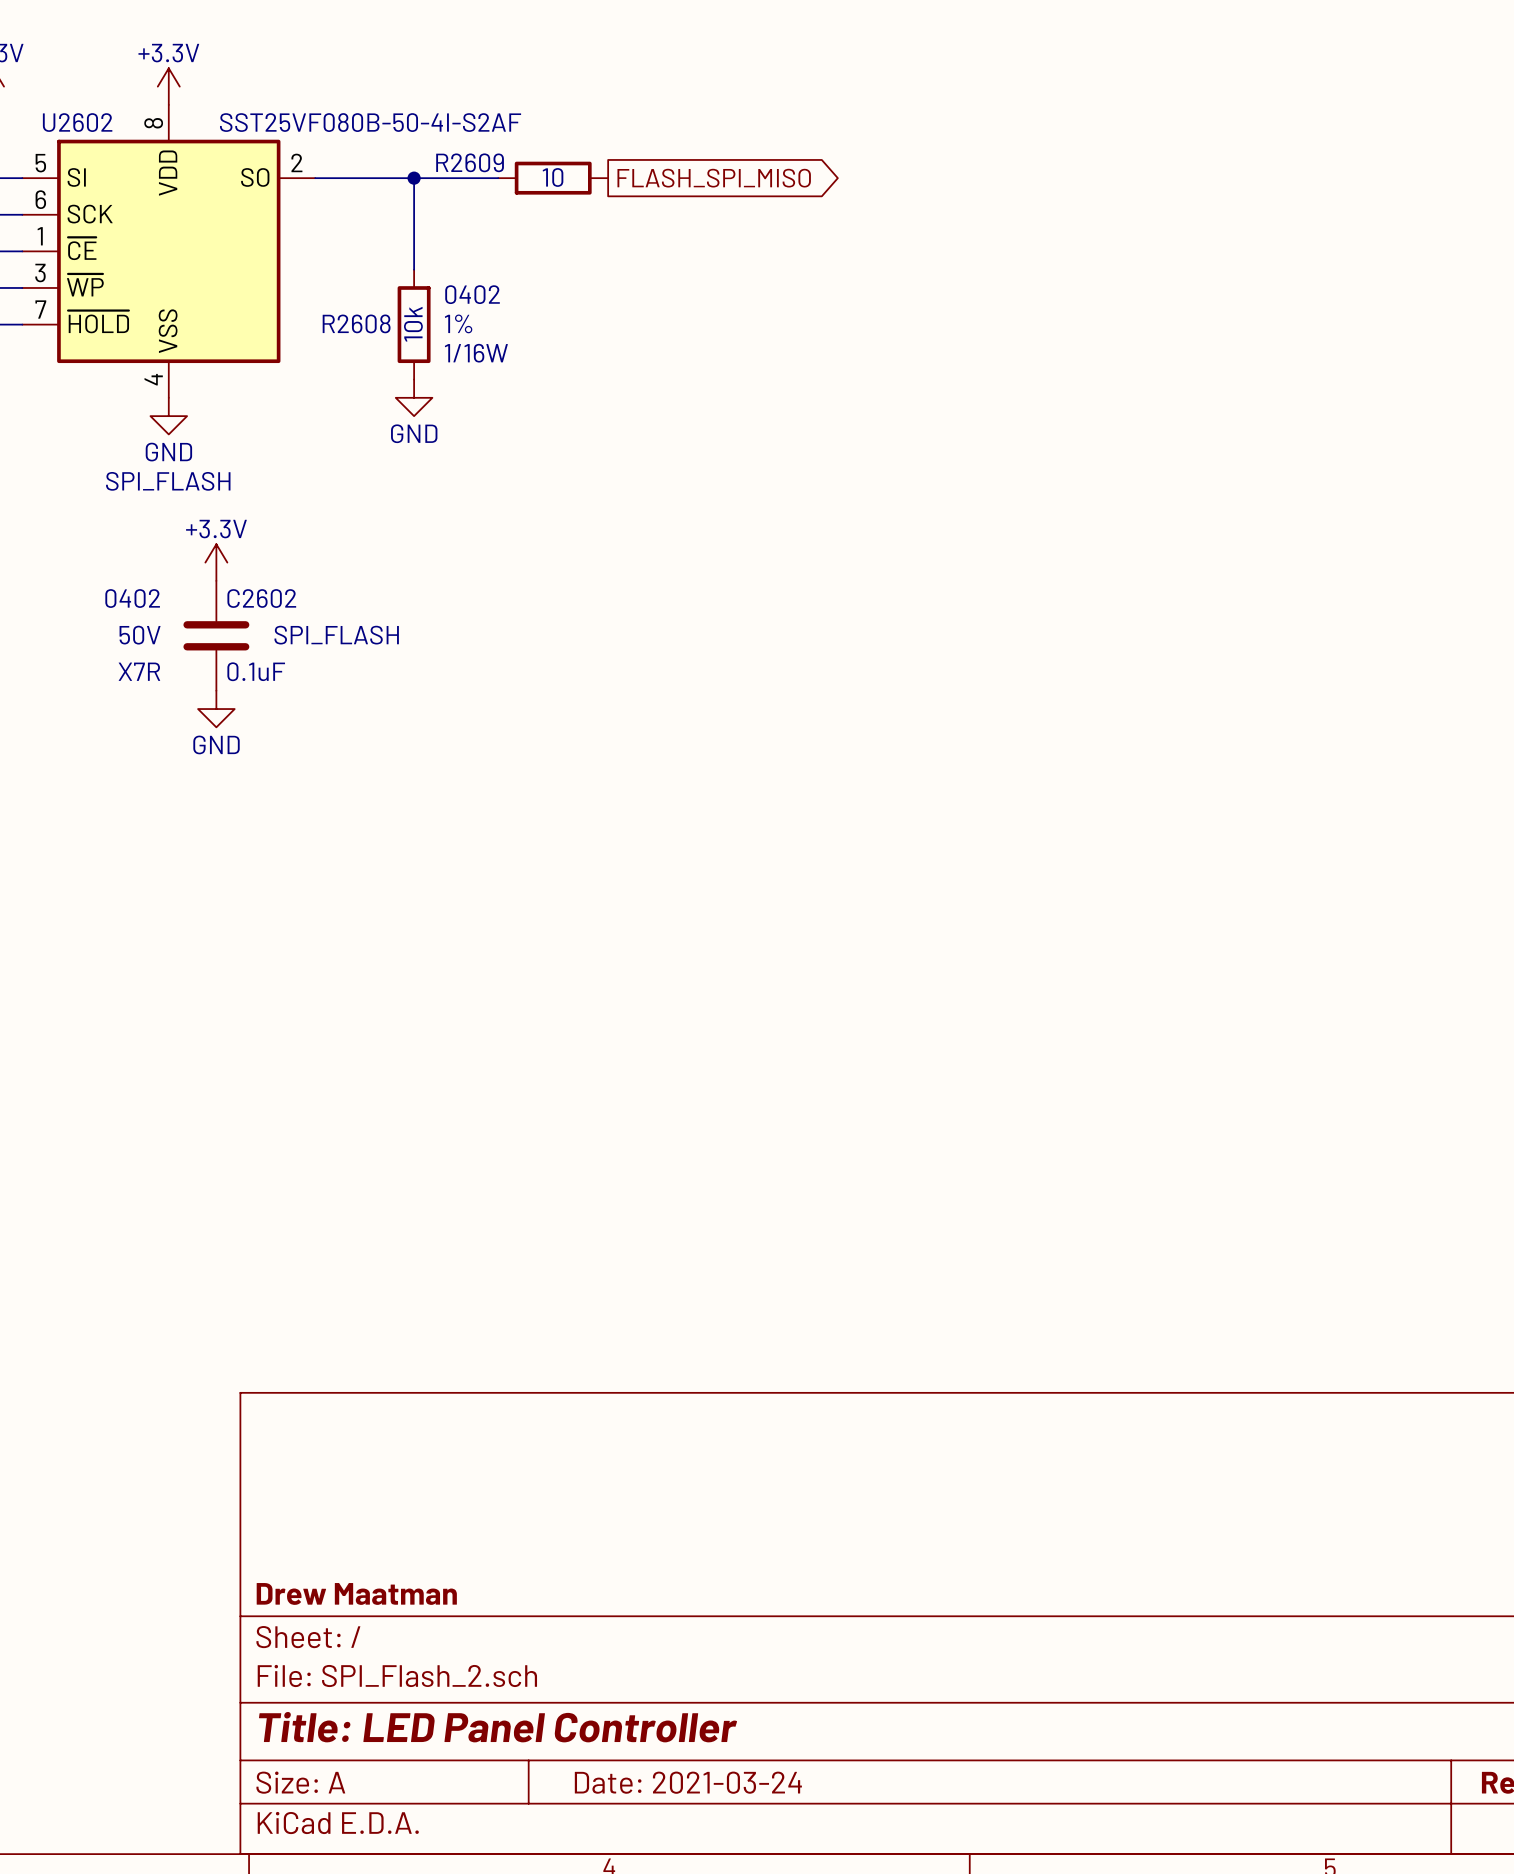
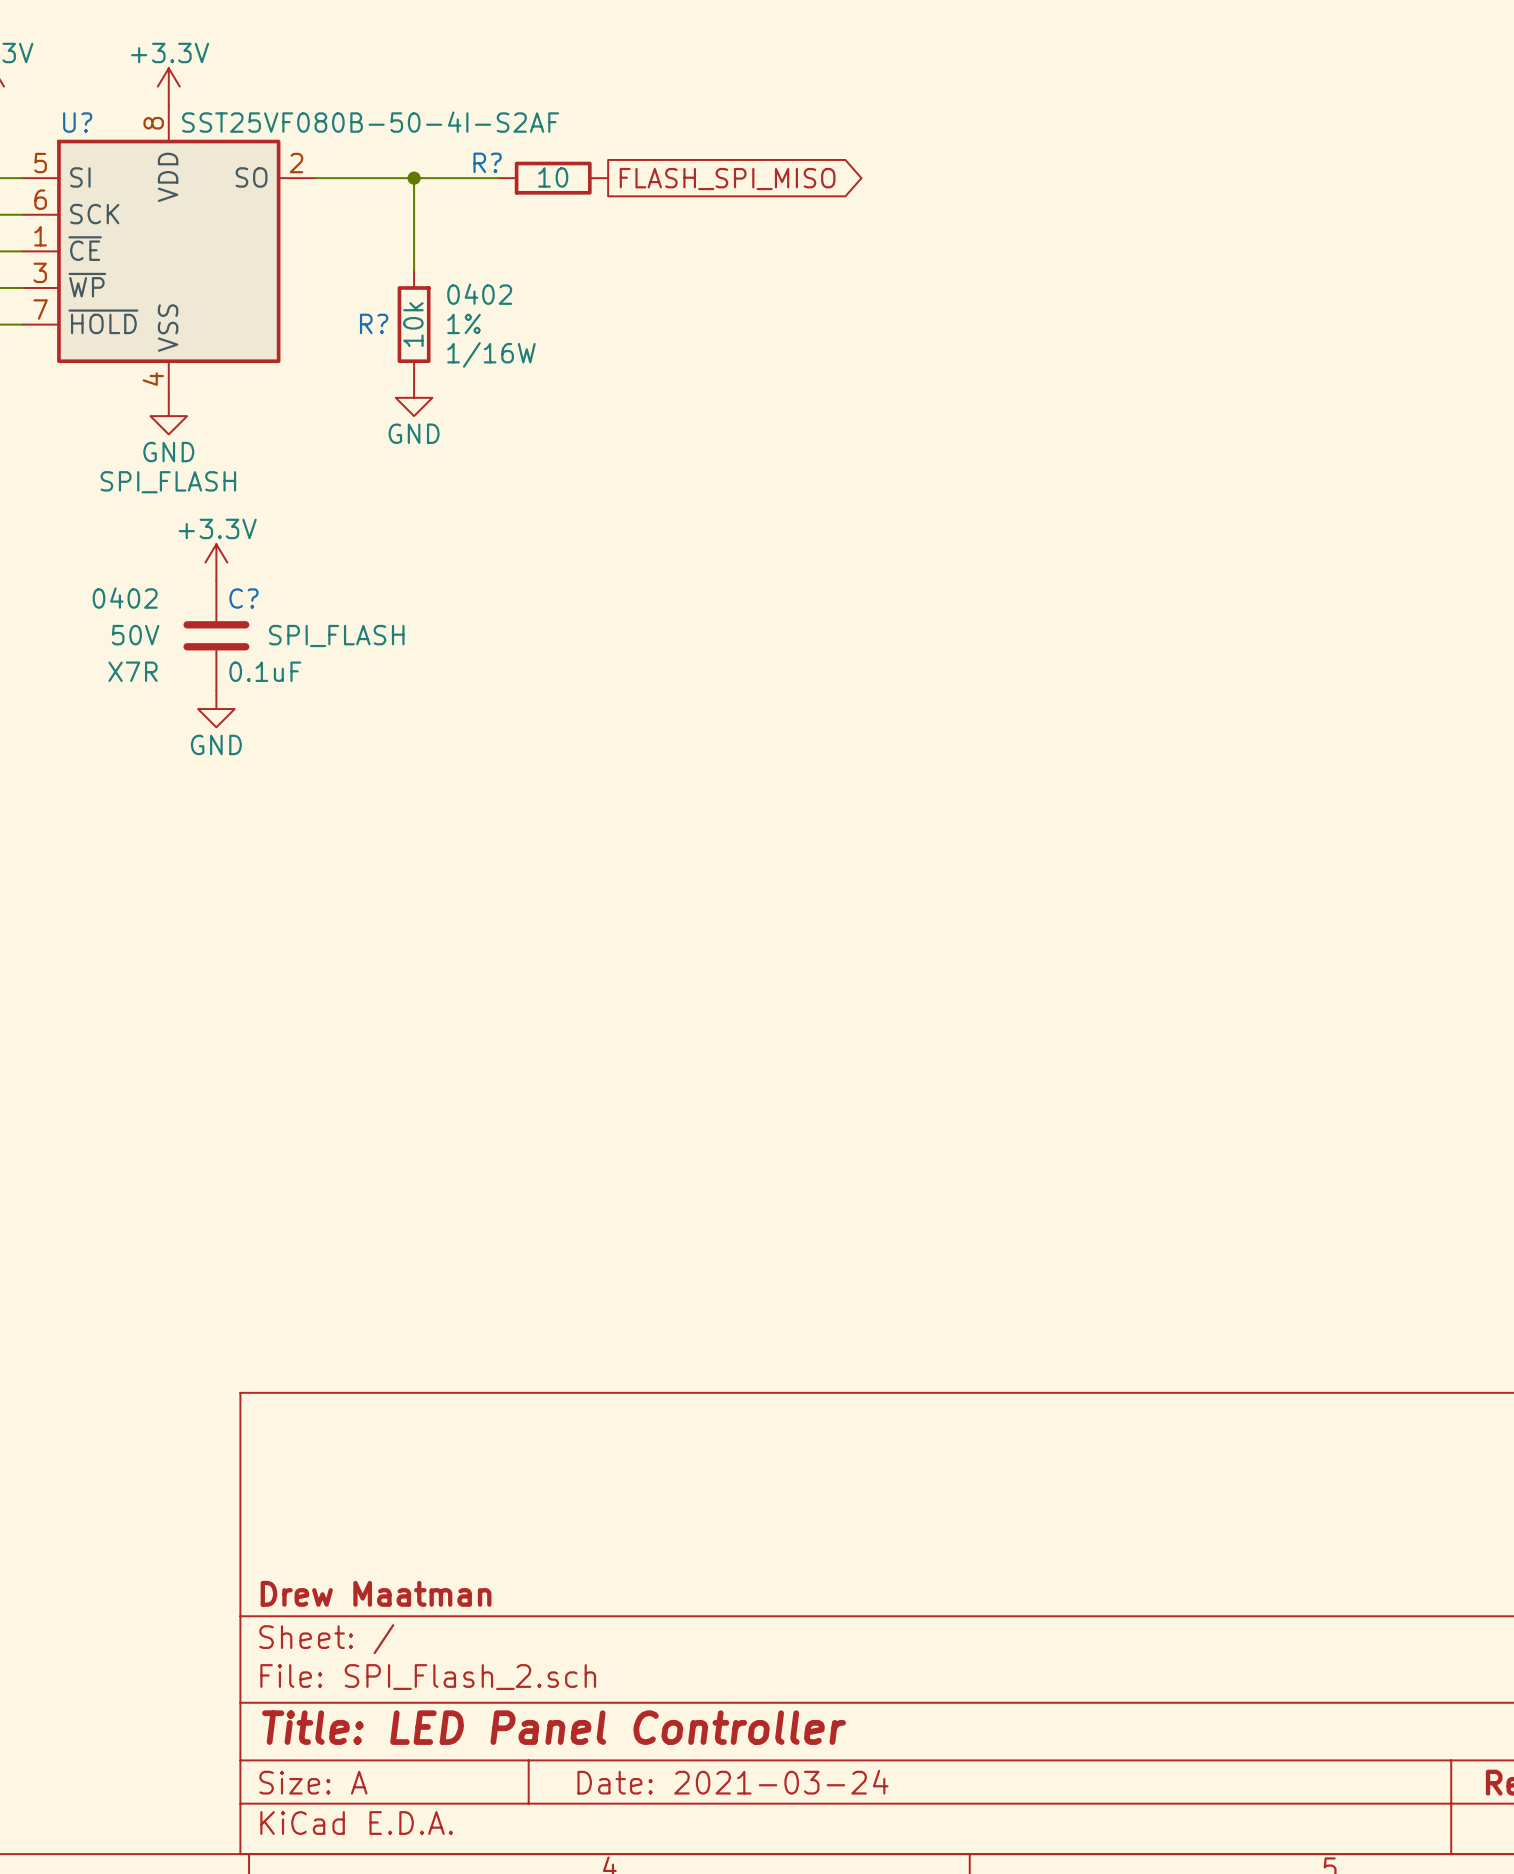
U2602 name: U2602 (77, 122) -> U? (77, 122)
R2609 name: R2609 (470, 162) -> R? (487, 162)
R2608 name: R2608 (356, 323) -> R? (374, 323)
C2602 name: C2602 (261, 598) -> C? (243, 598)

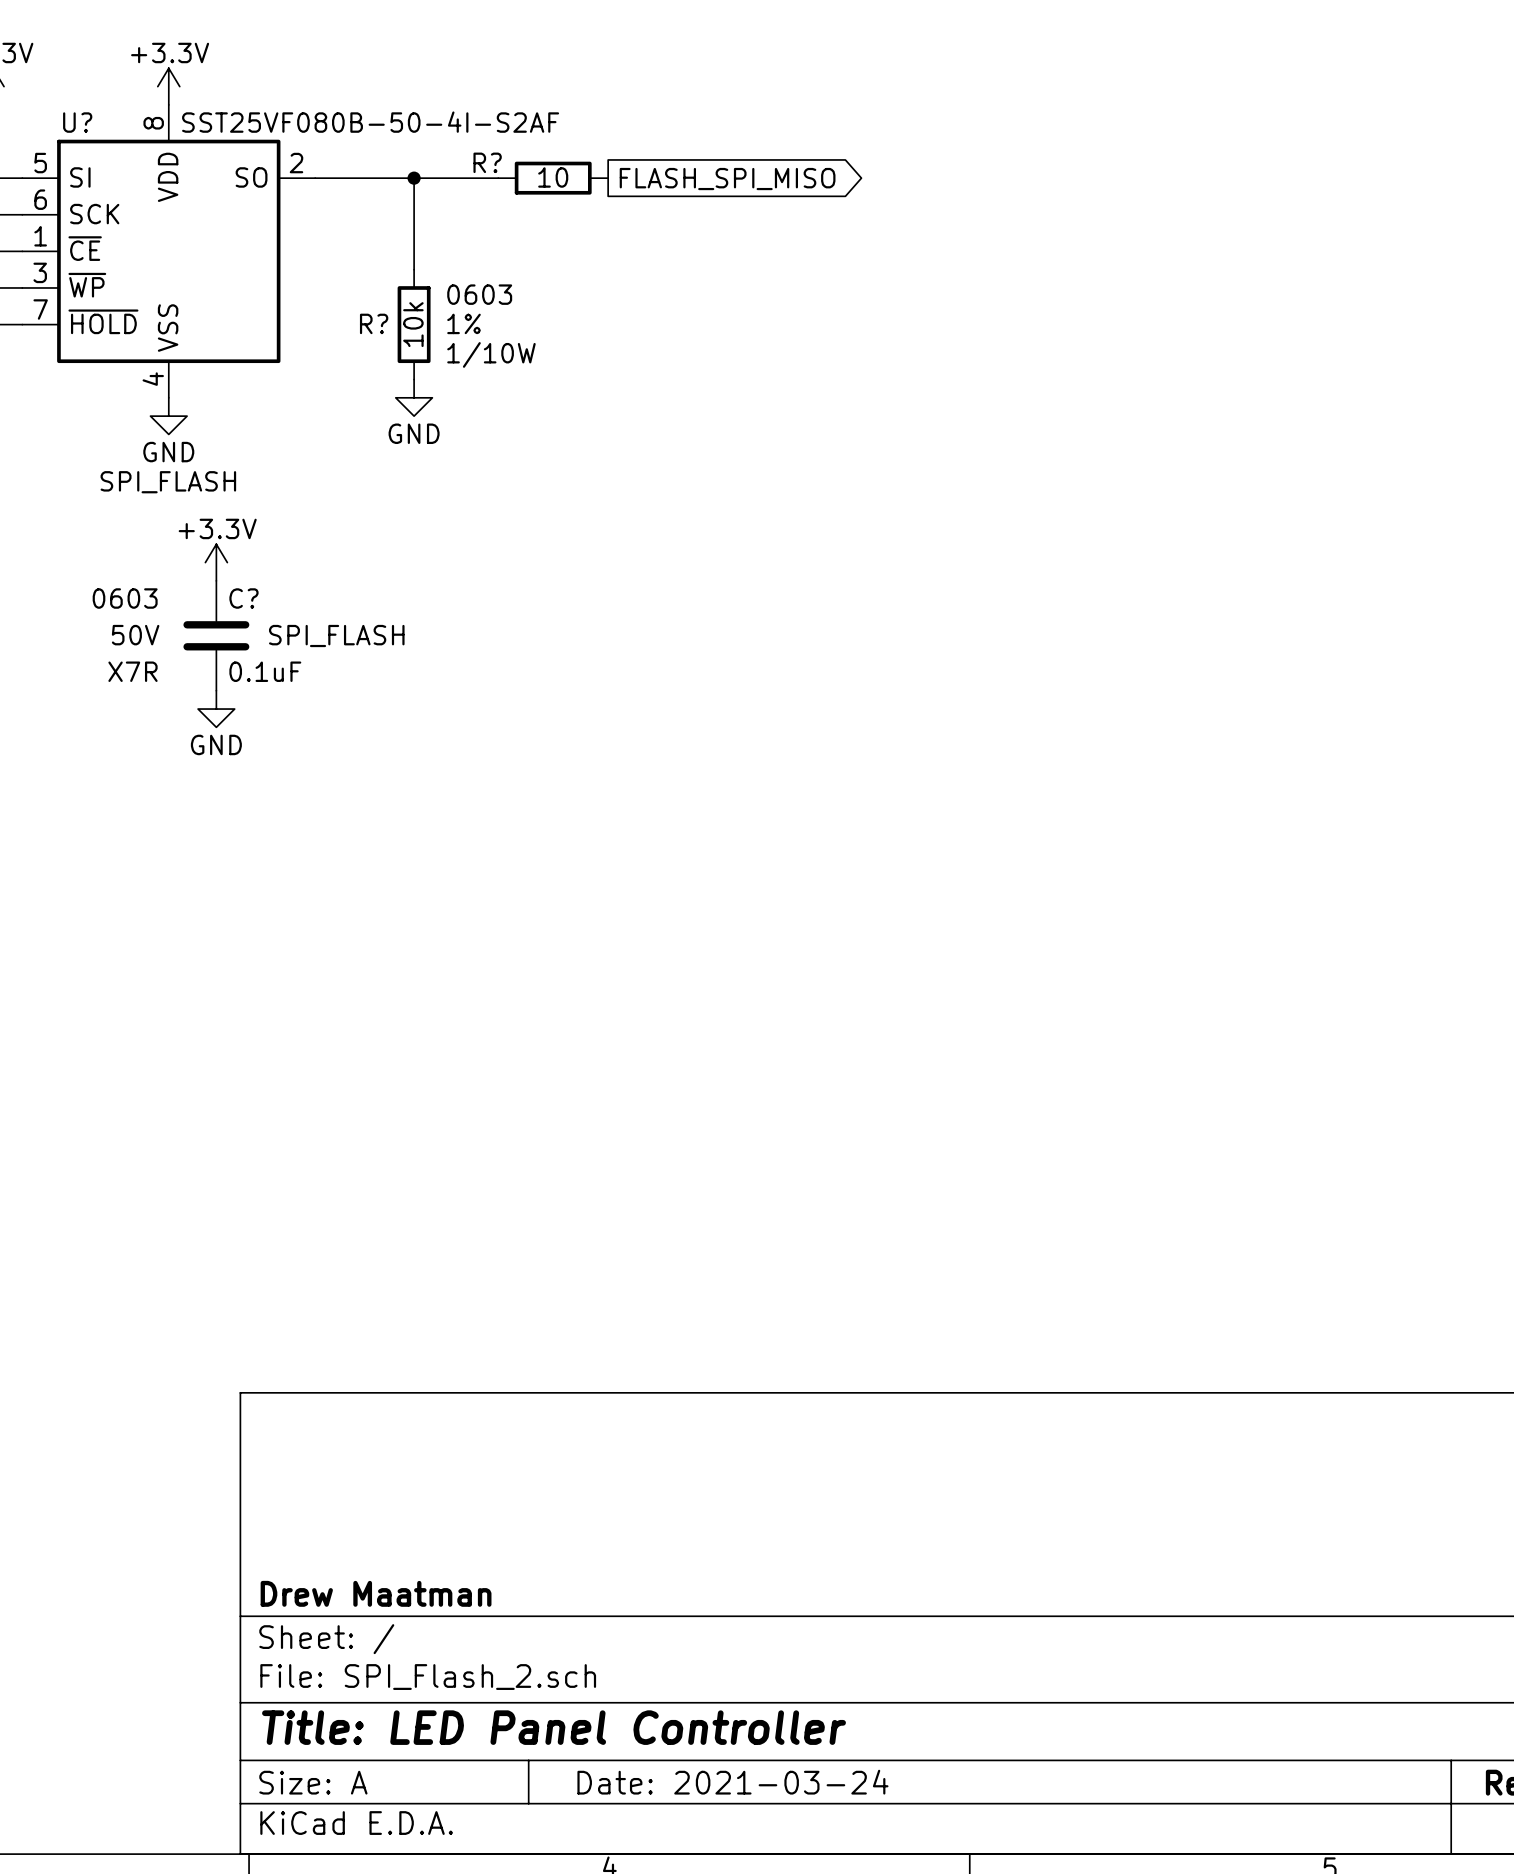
R? text: 0402 (479, 294) -> 0603 (479, 294)
R? text: 1/16W (491, 354) -> 1/10W (491, 354)
C? text: 0402 (125, 598) -> 0603 (125, 598)

